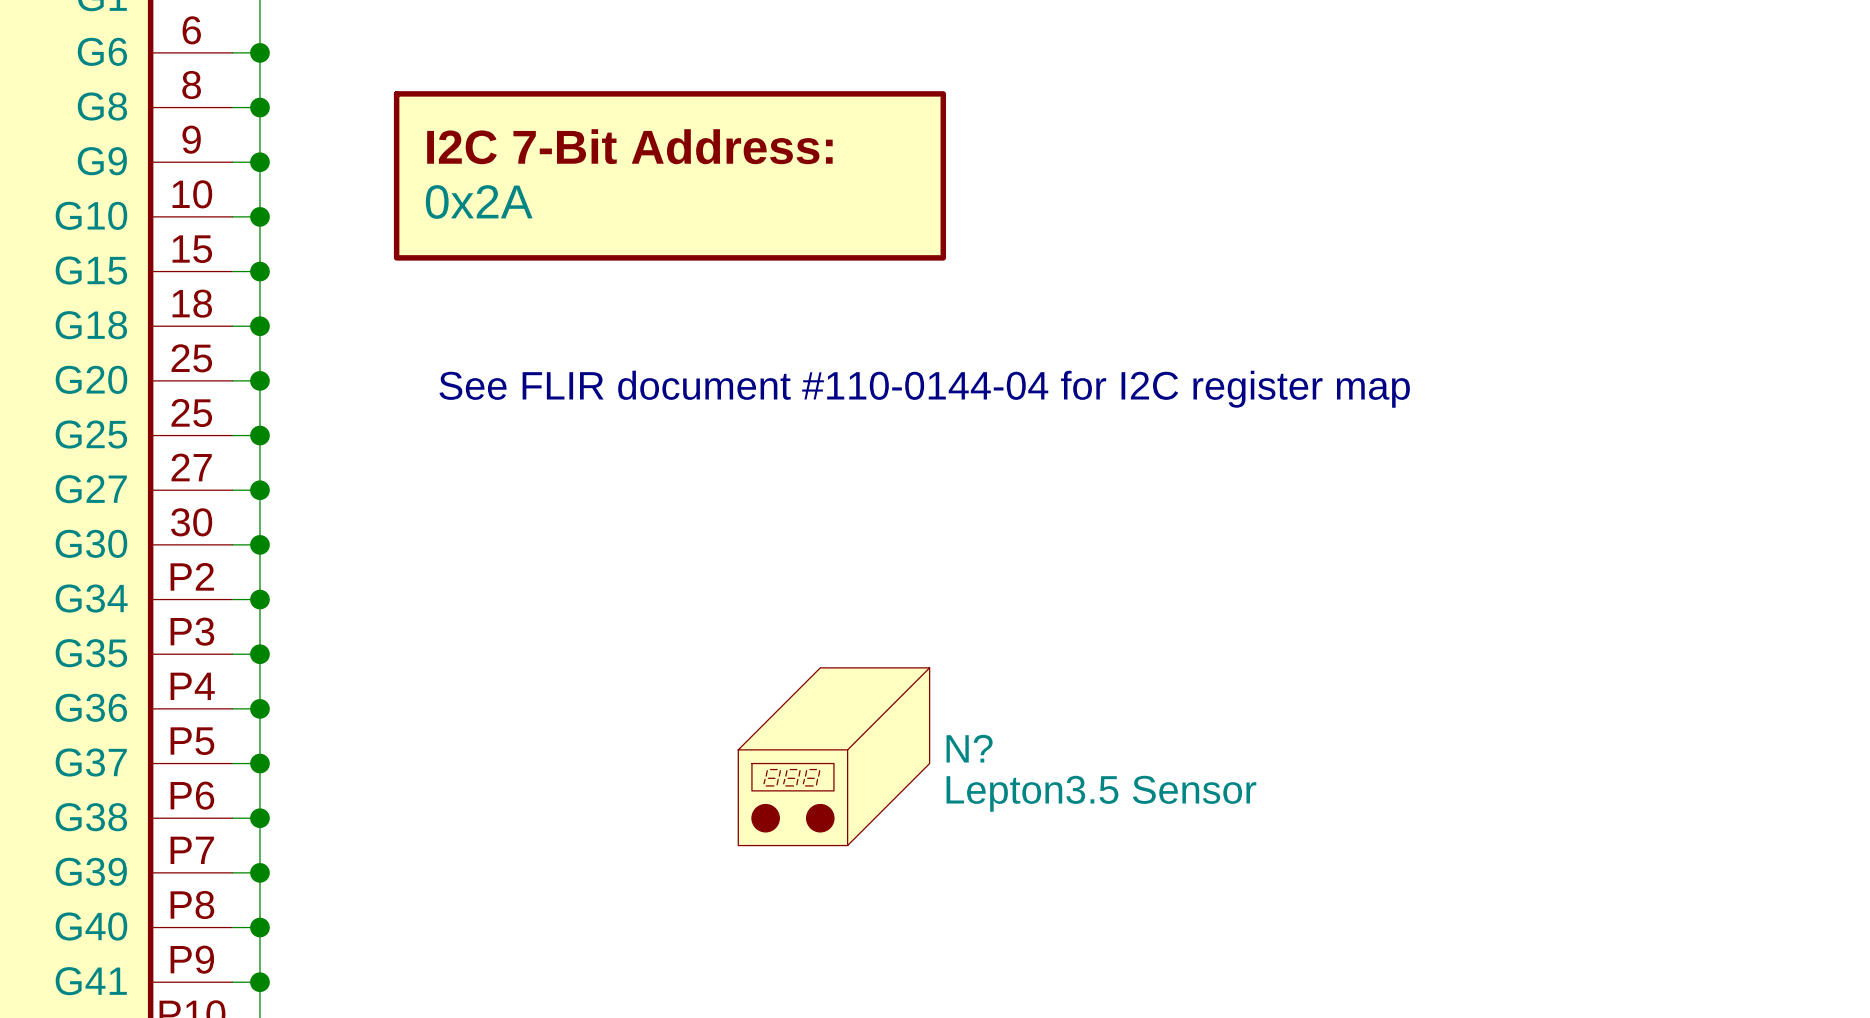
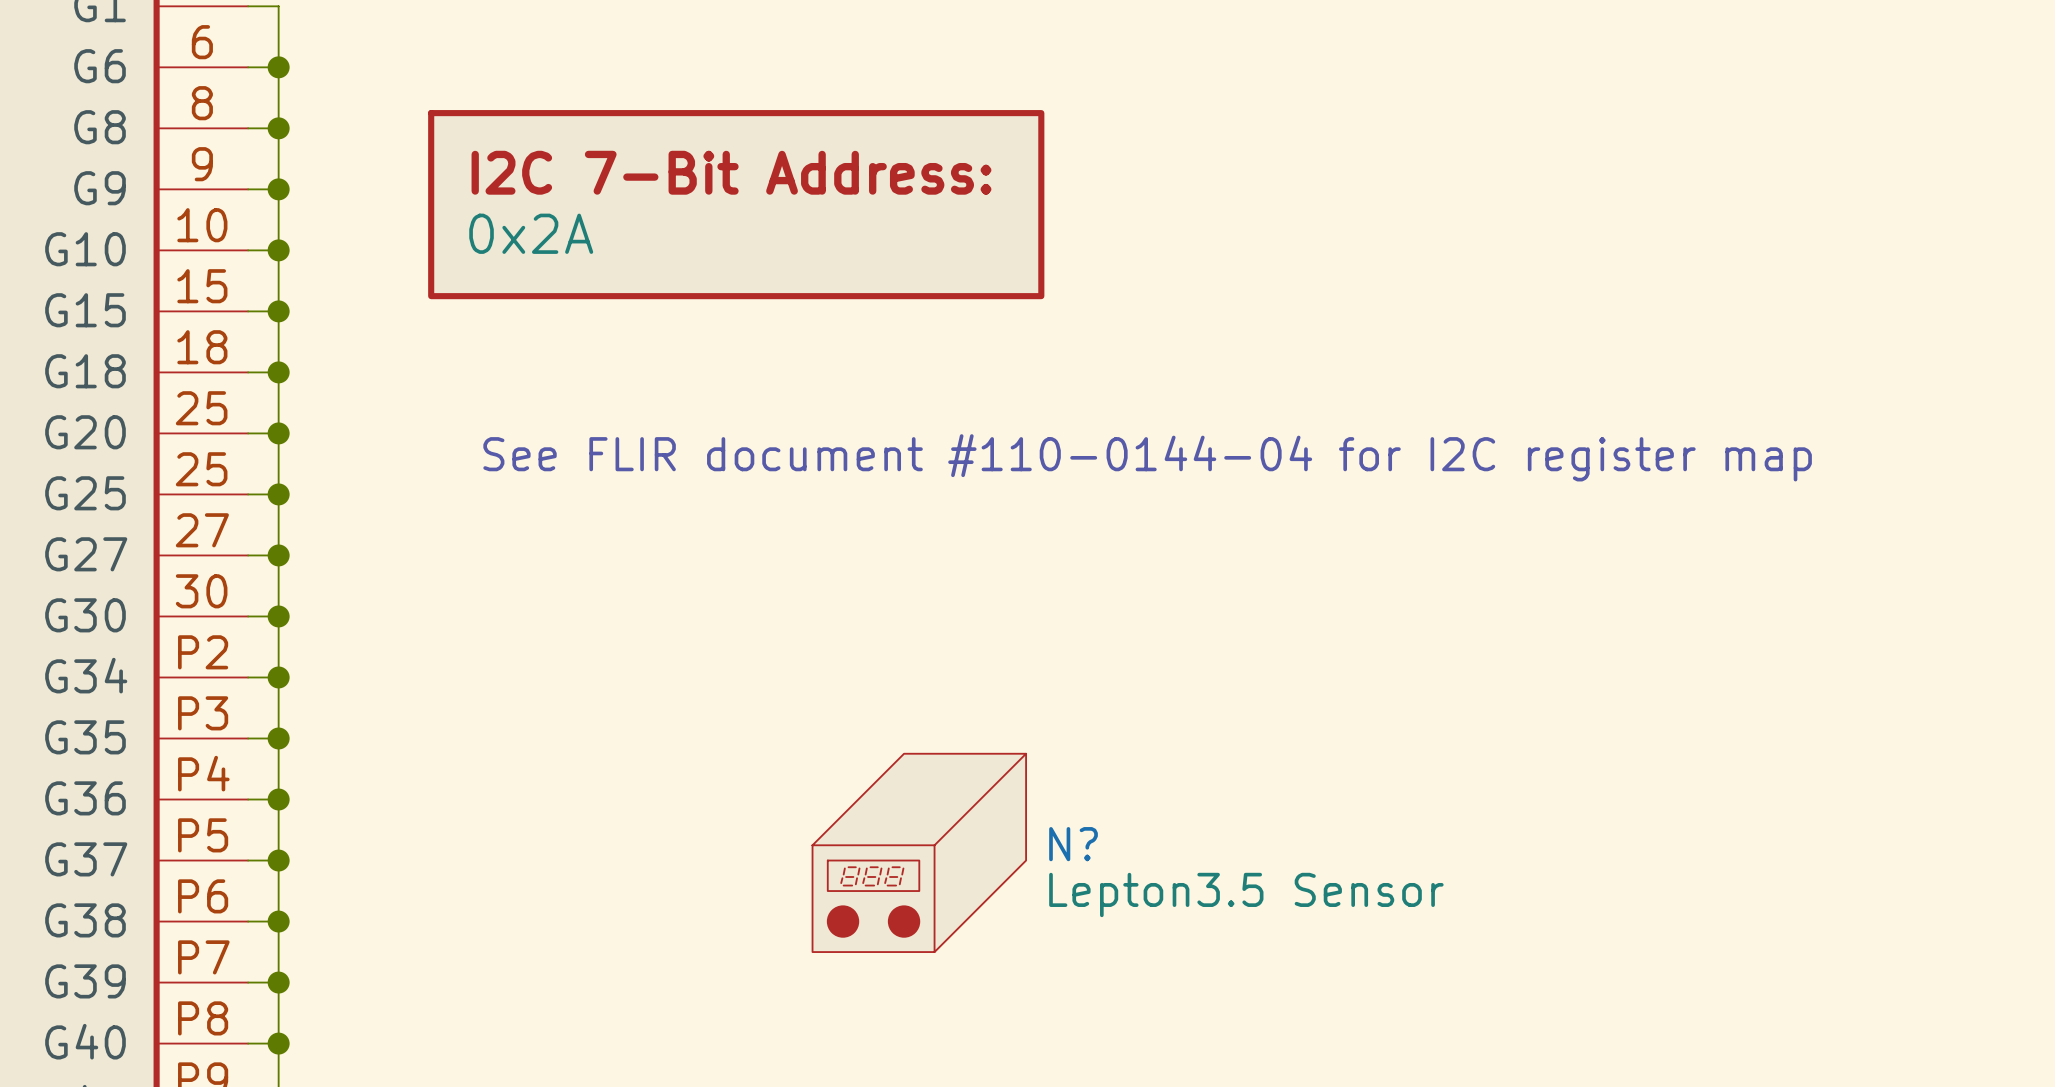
text position: See FLIR document #110-0144-04 for I2C register map (924, 389) -> See FLIR document #110-0144-04 for I2C register map (1147, 457)

